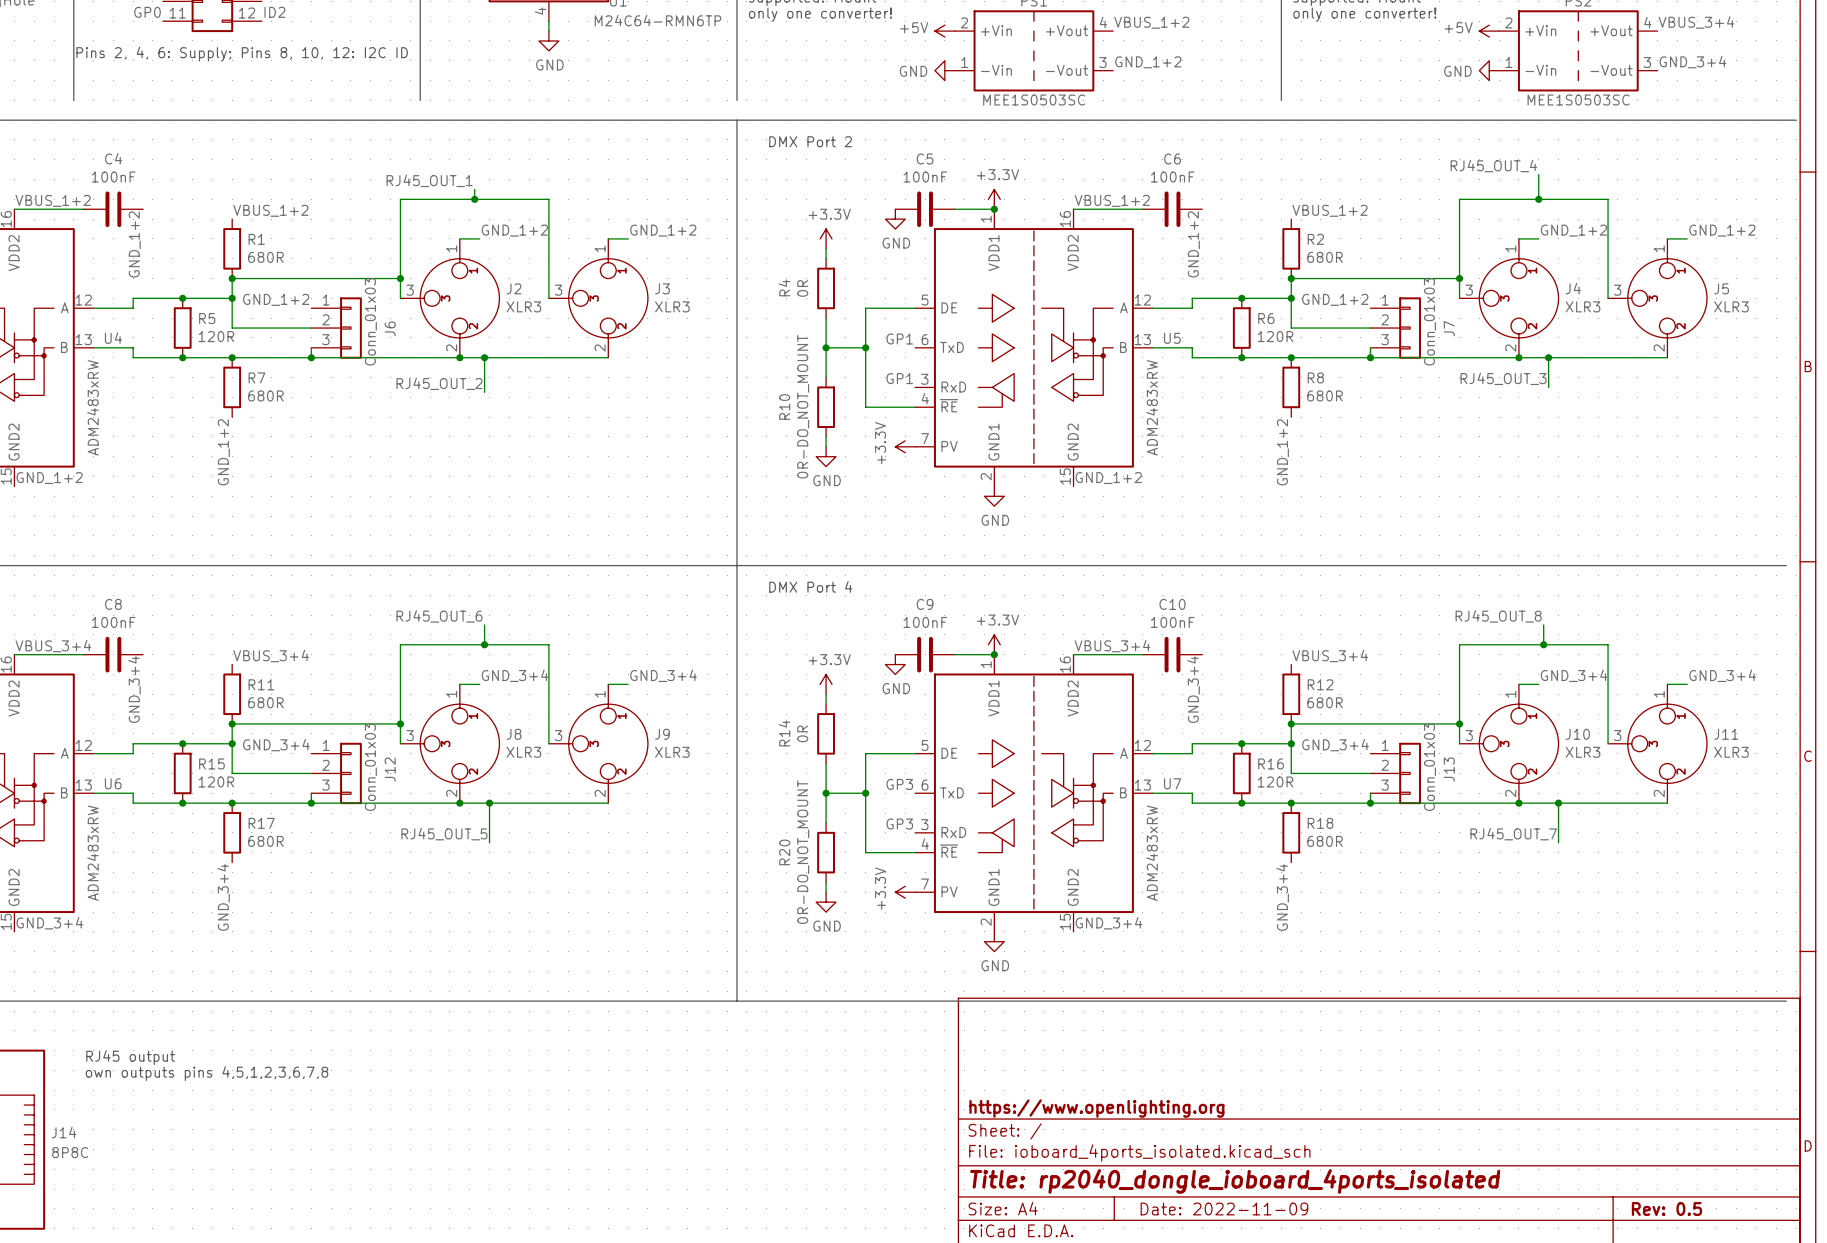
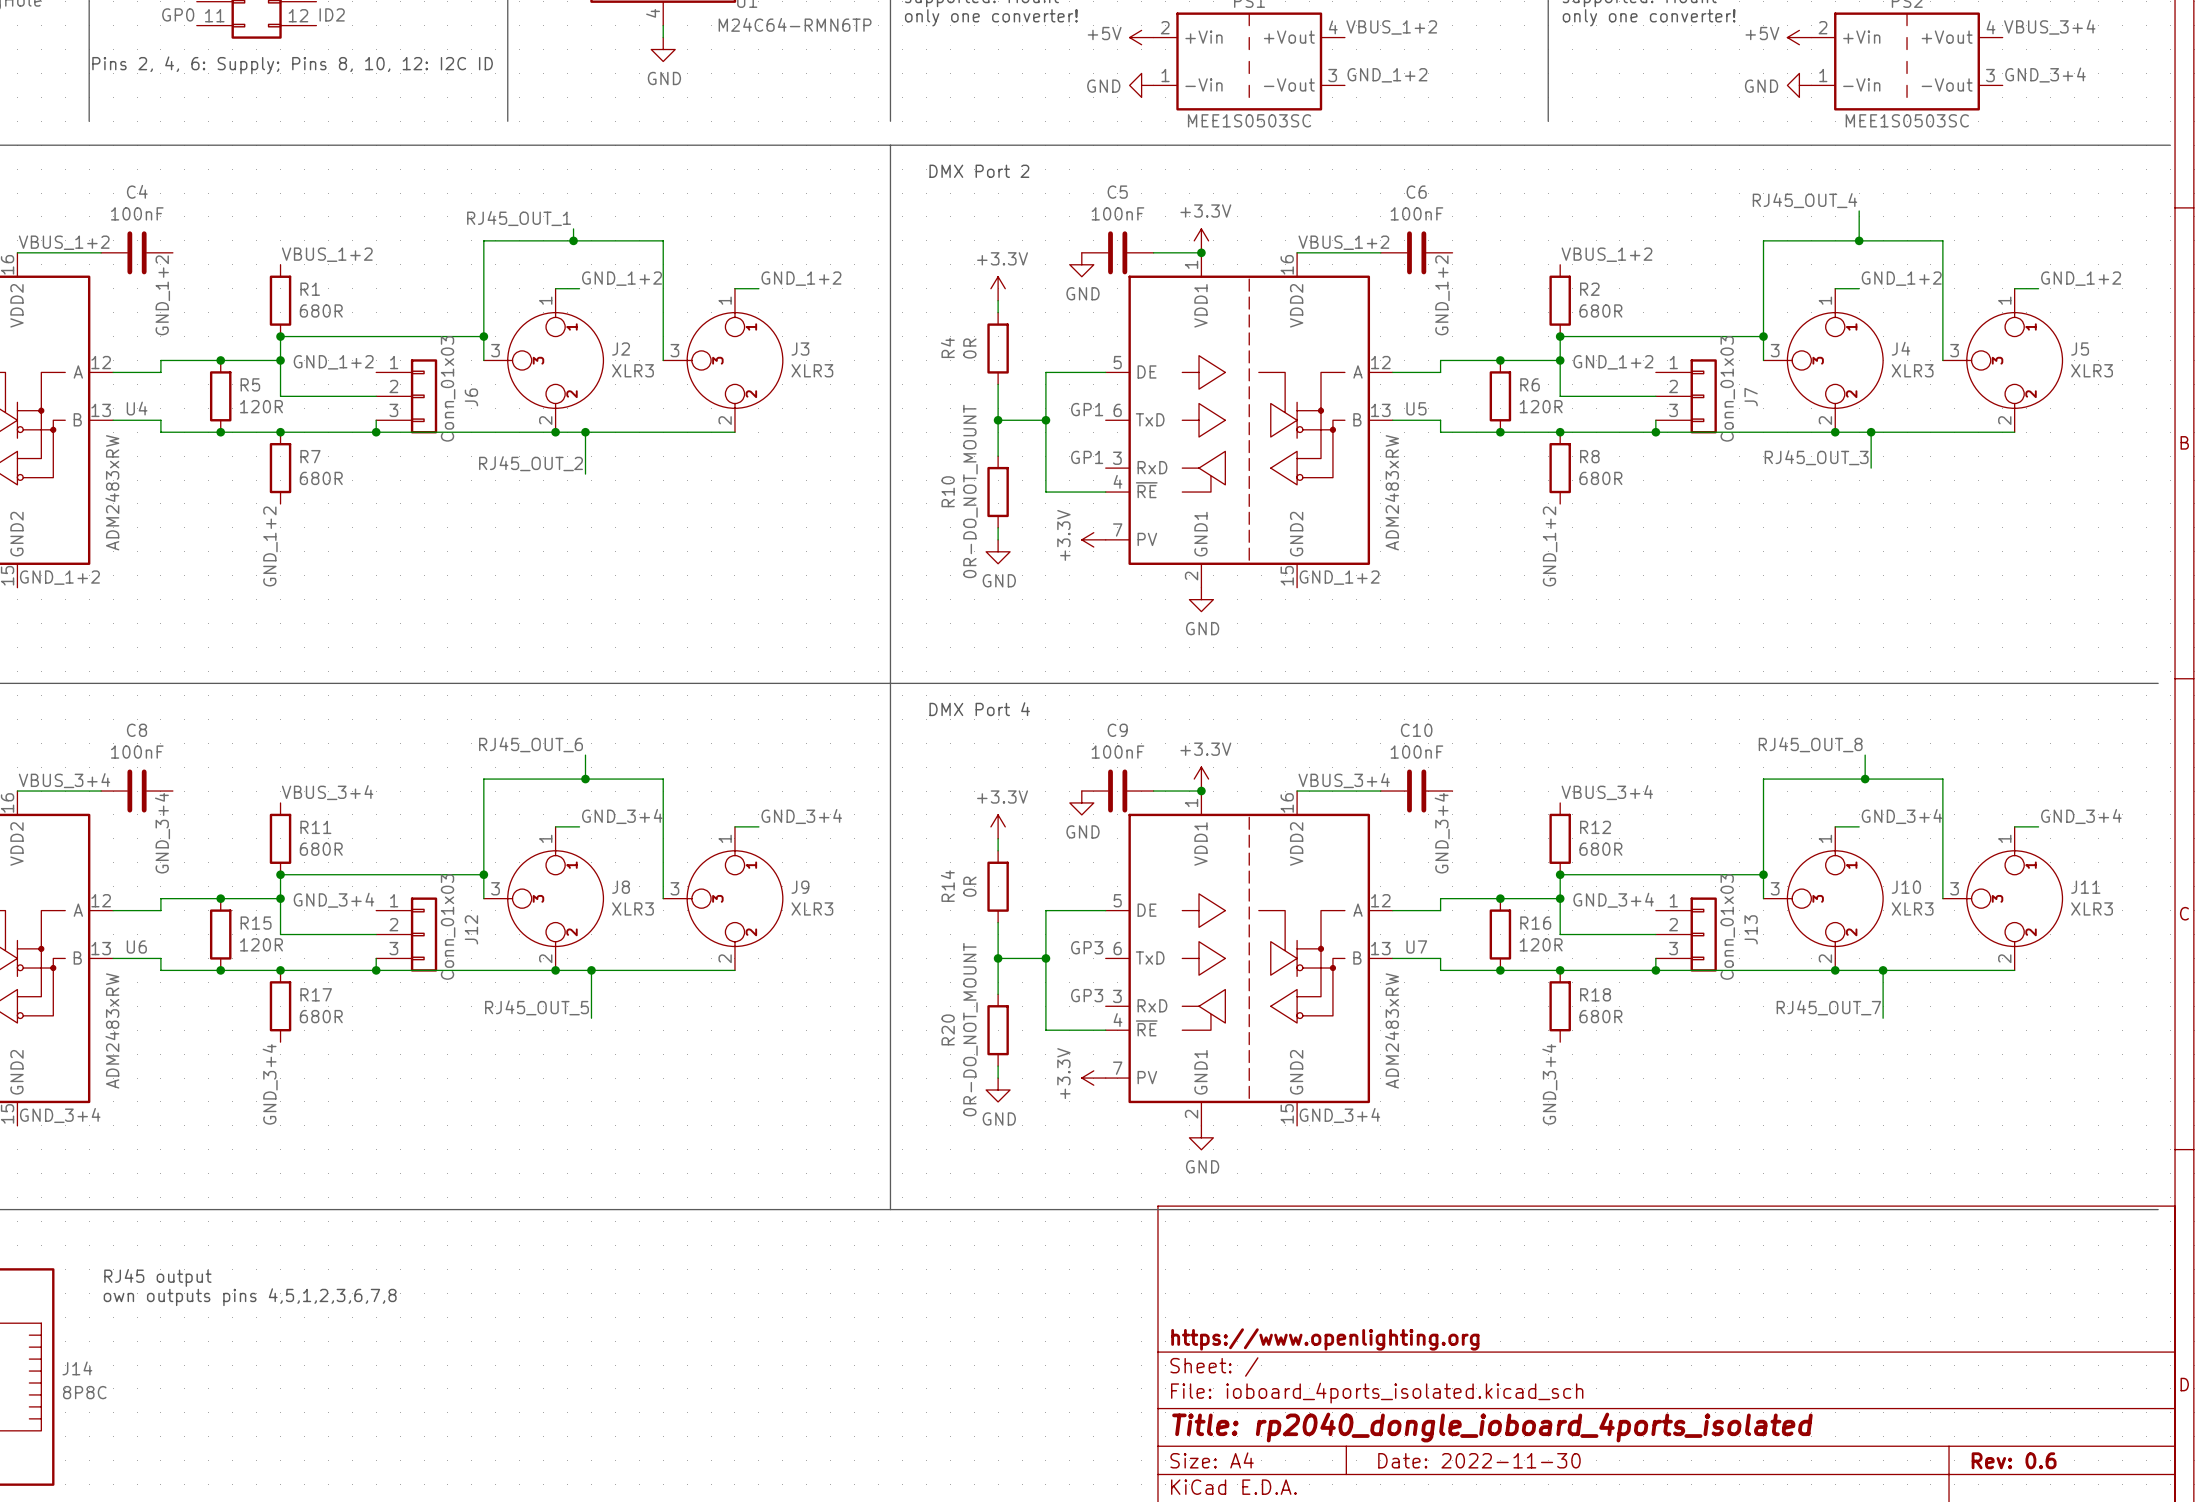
title block: Date: 2022-11-09 (1224, 1209) -> Date: 2022-11-30 (1479, 1460)
title block: Rev: 0.5 (1666, 1209) -> Rev: 0.6 (2014, 1460)

